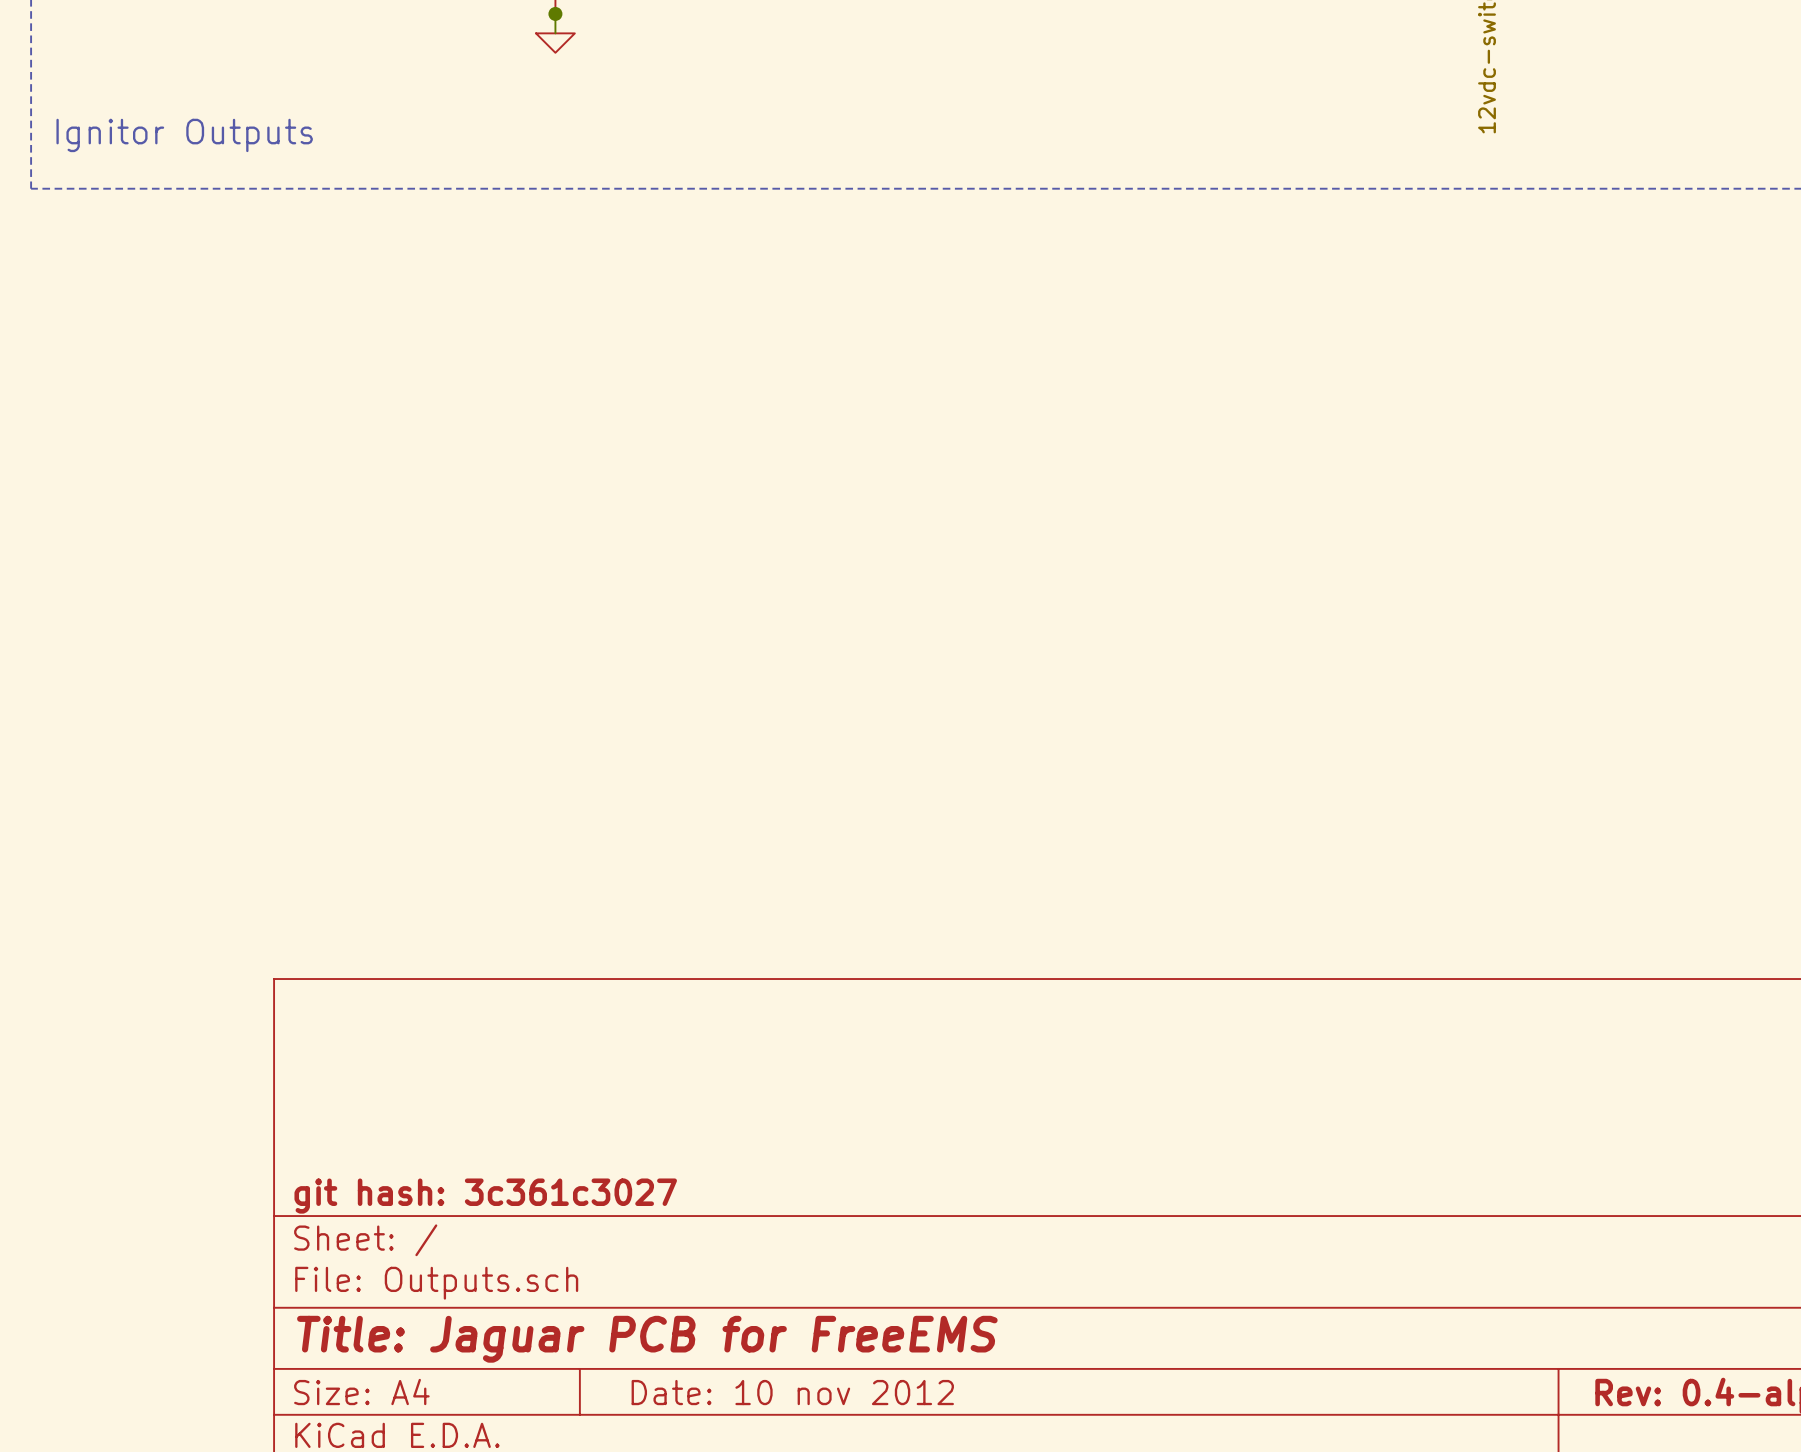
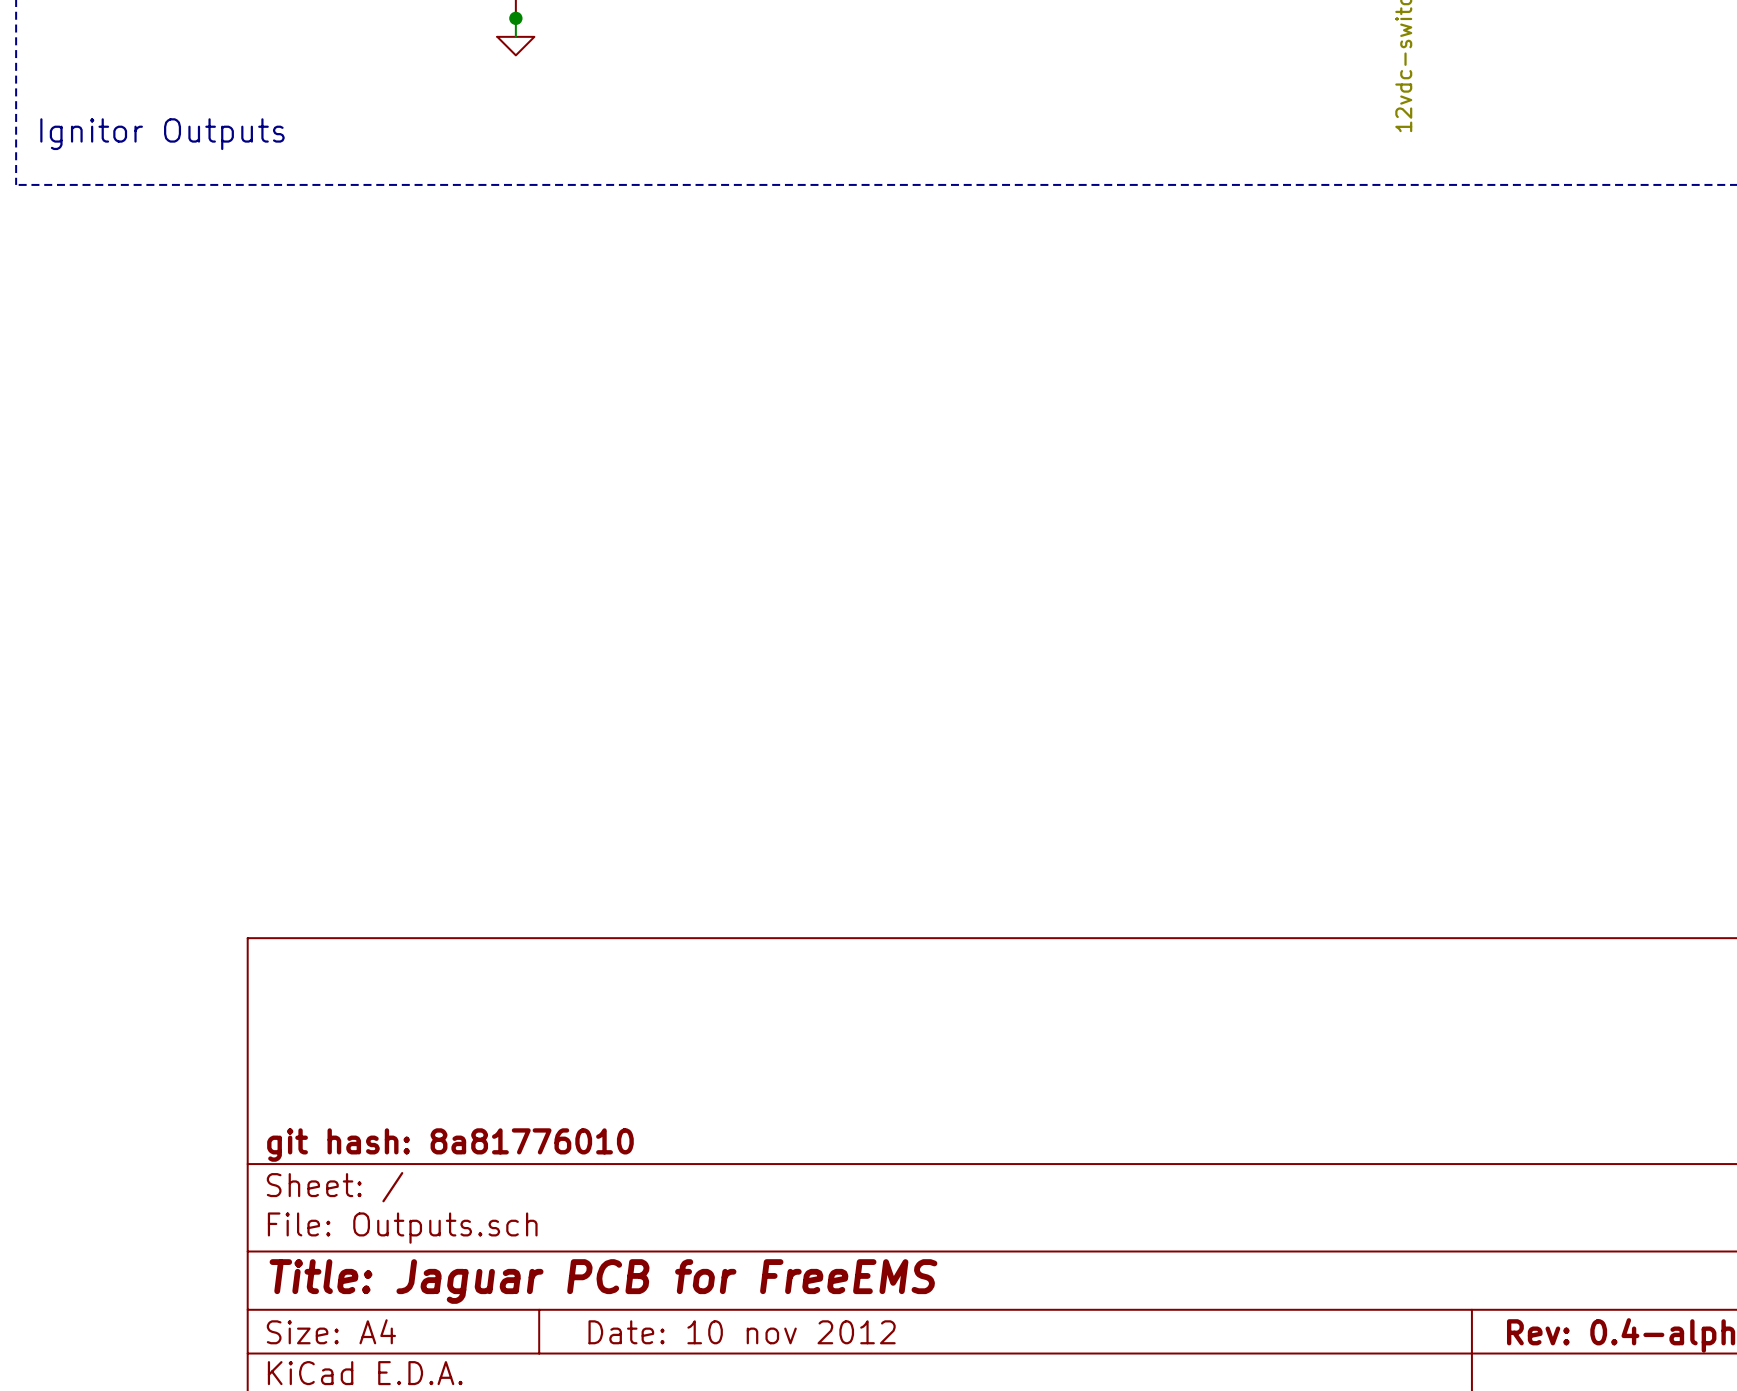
title block: git hash: 3c361c3027 (485, 1196) -> git hash: 8a81776010 (450, 1145)

